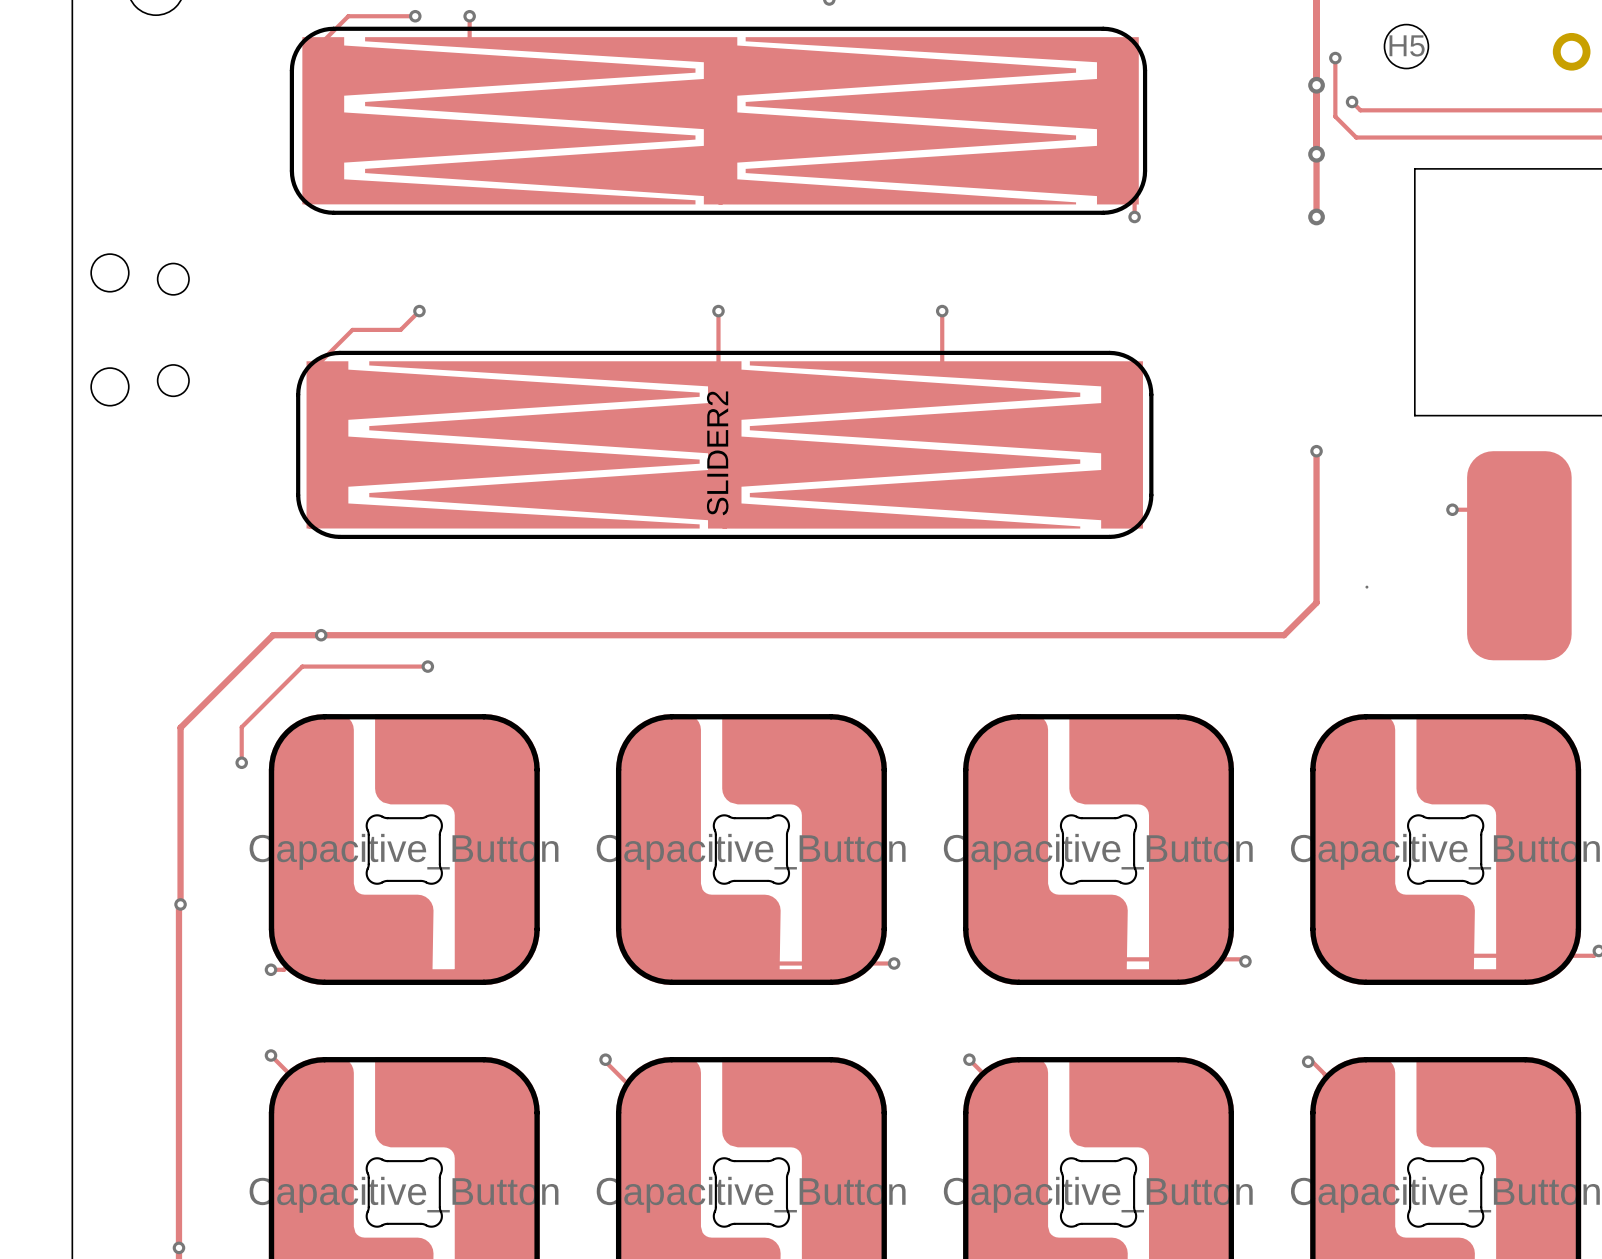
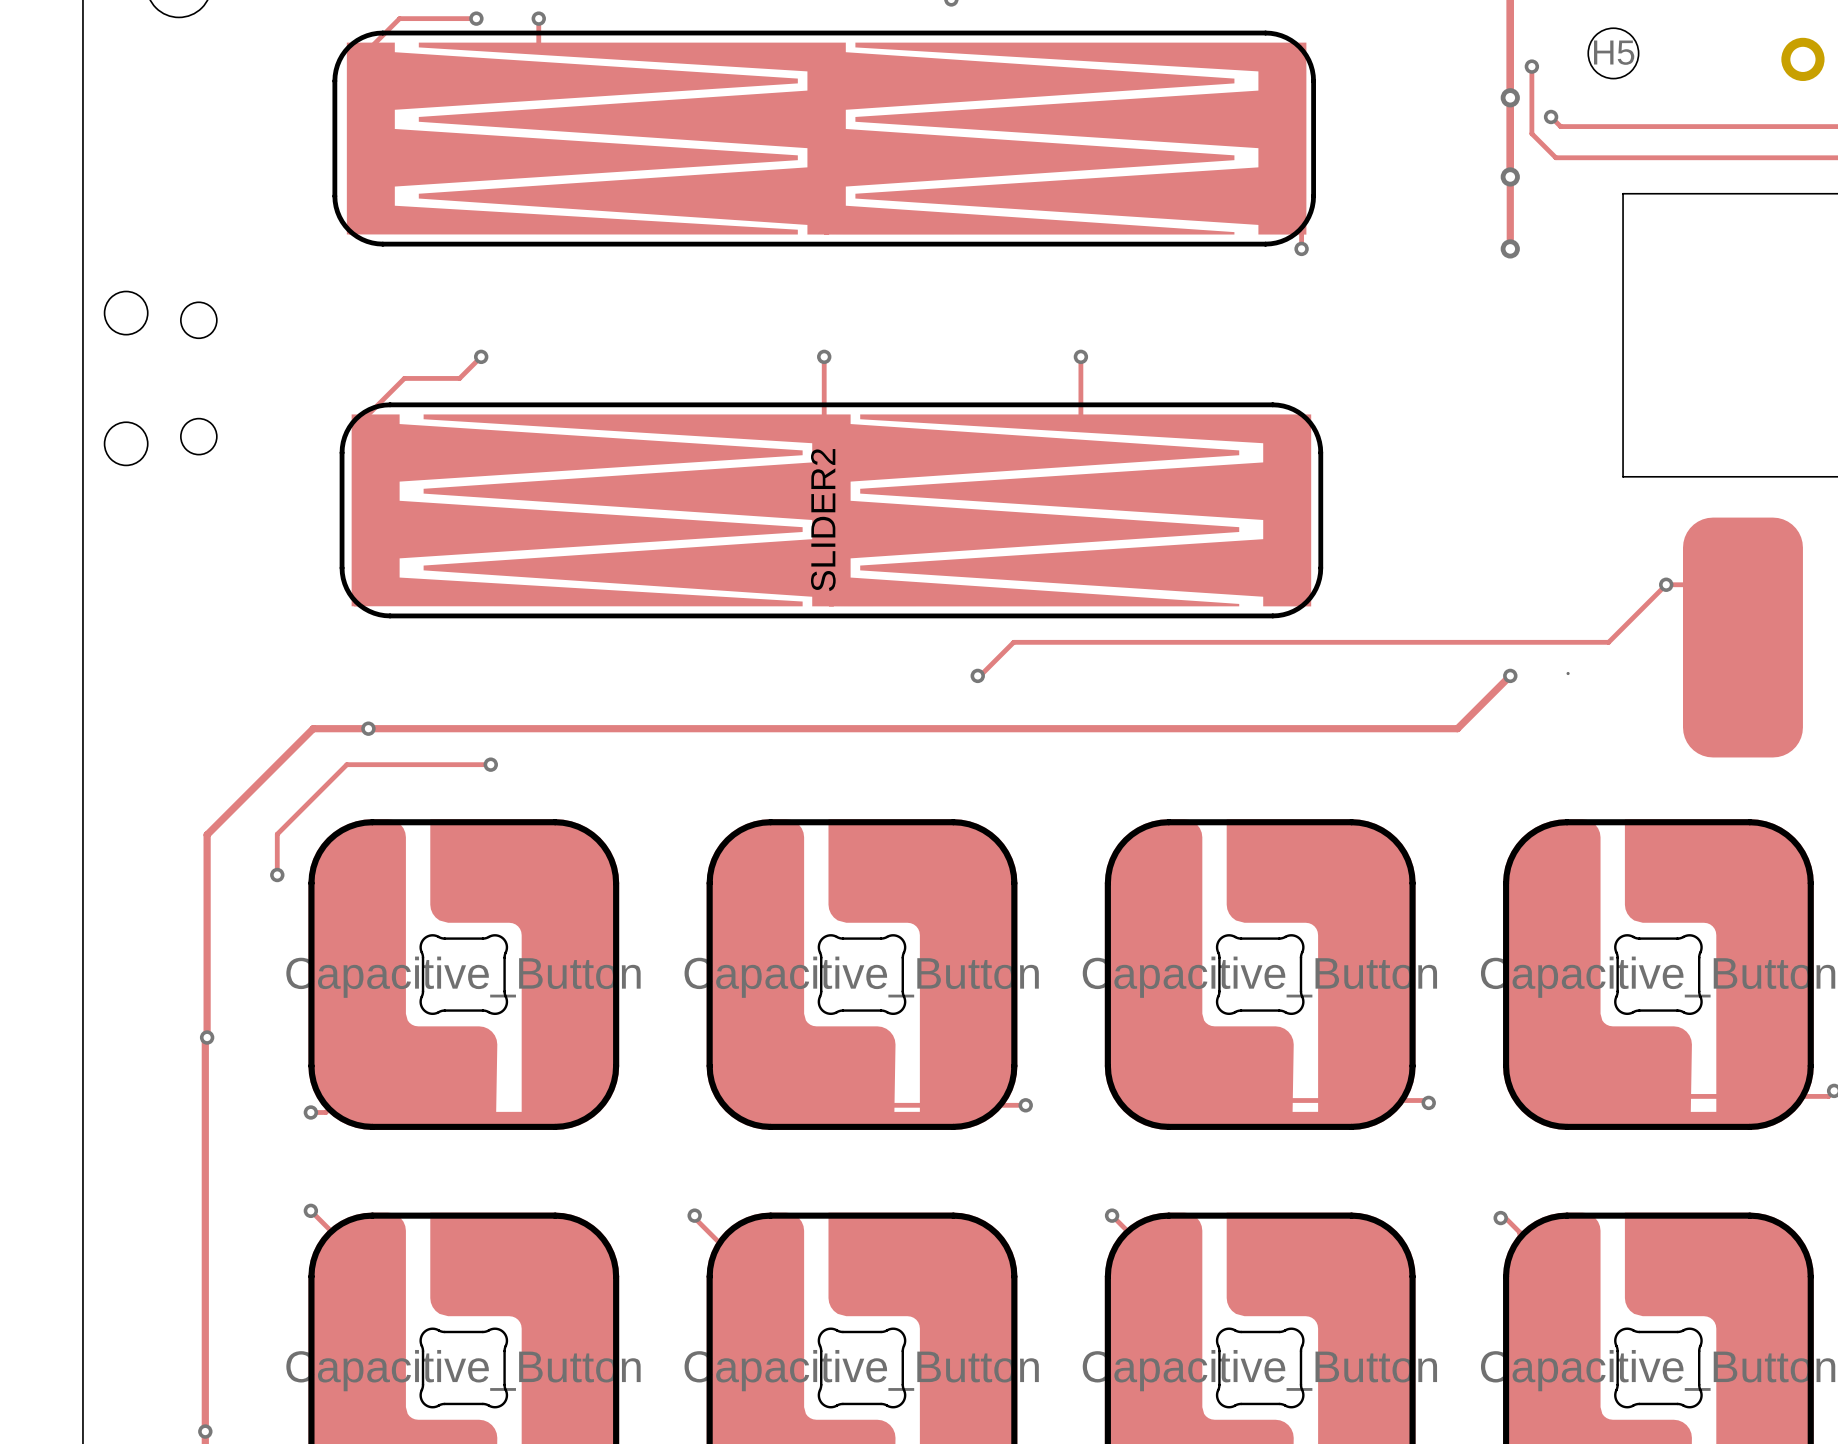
track: (1316, 451) (1316, 602) (1284, 635) (1270, 635) -> (1510, 675) (1457, 728)
via: (1316, 451) -> none
track: none -> (1666, 584) (1608, 642) (1013, 642) (980, 675) (977, 675)
via: none -> (977, 675)
via: none -> (1510, 675)

